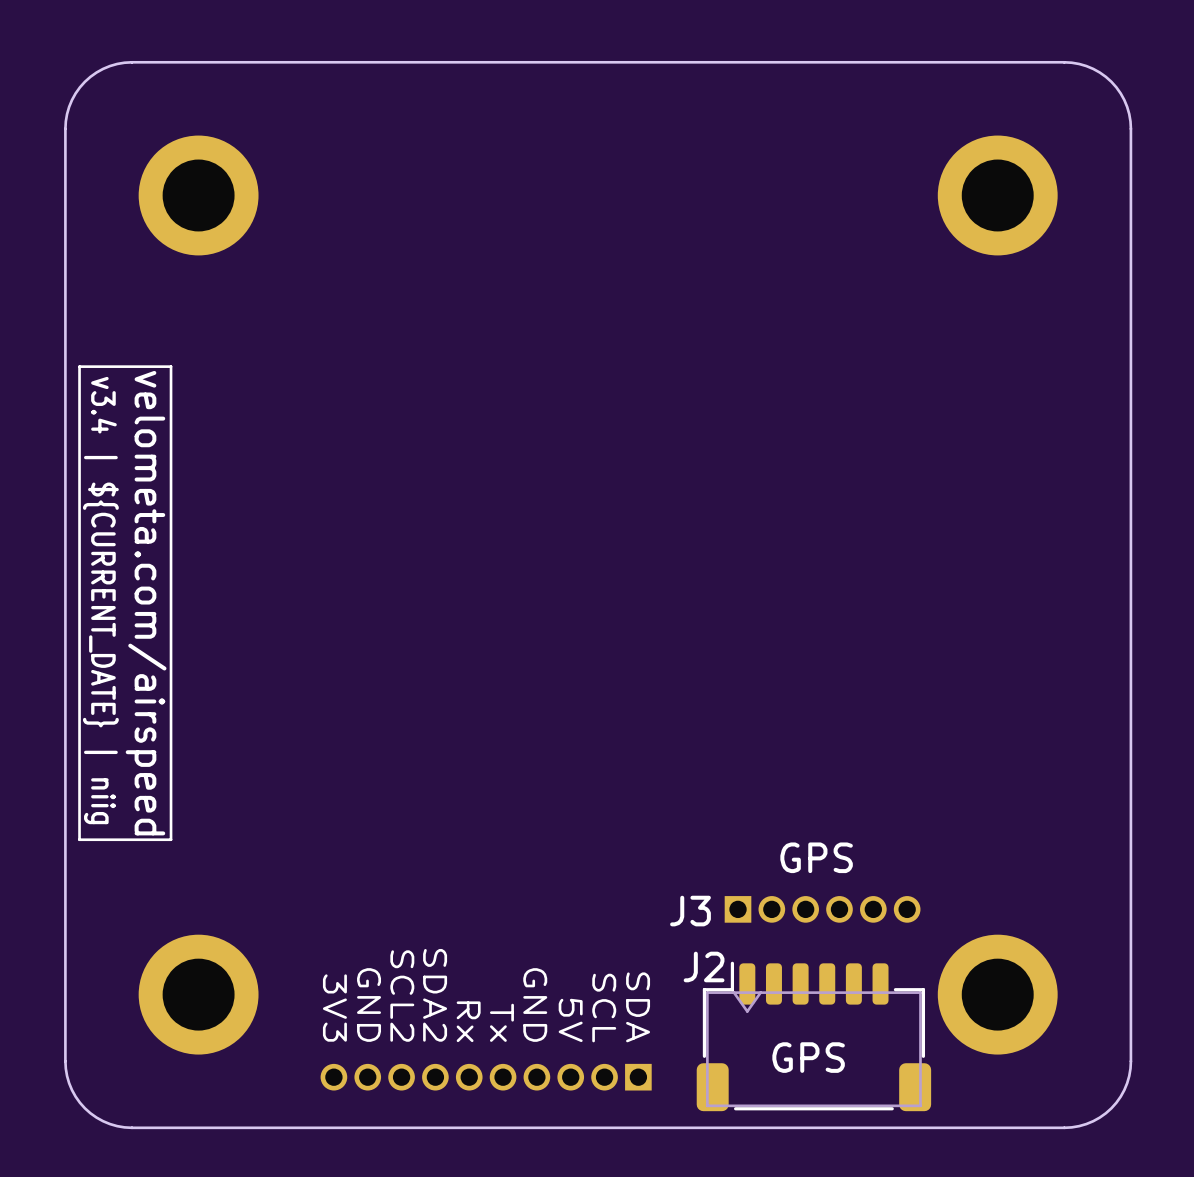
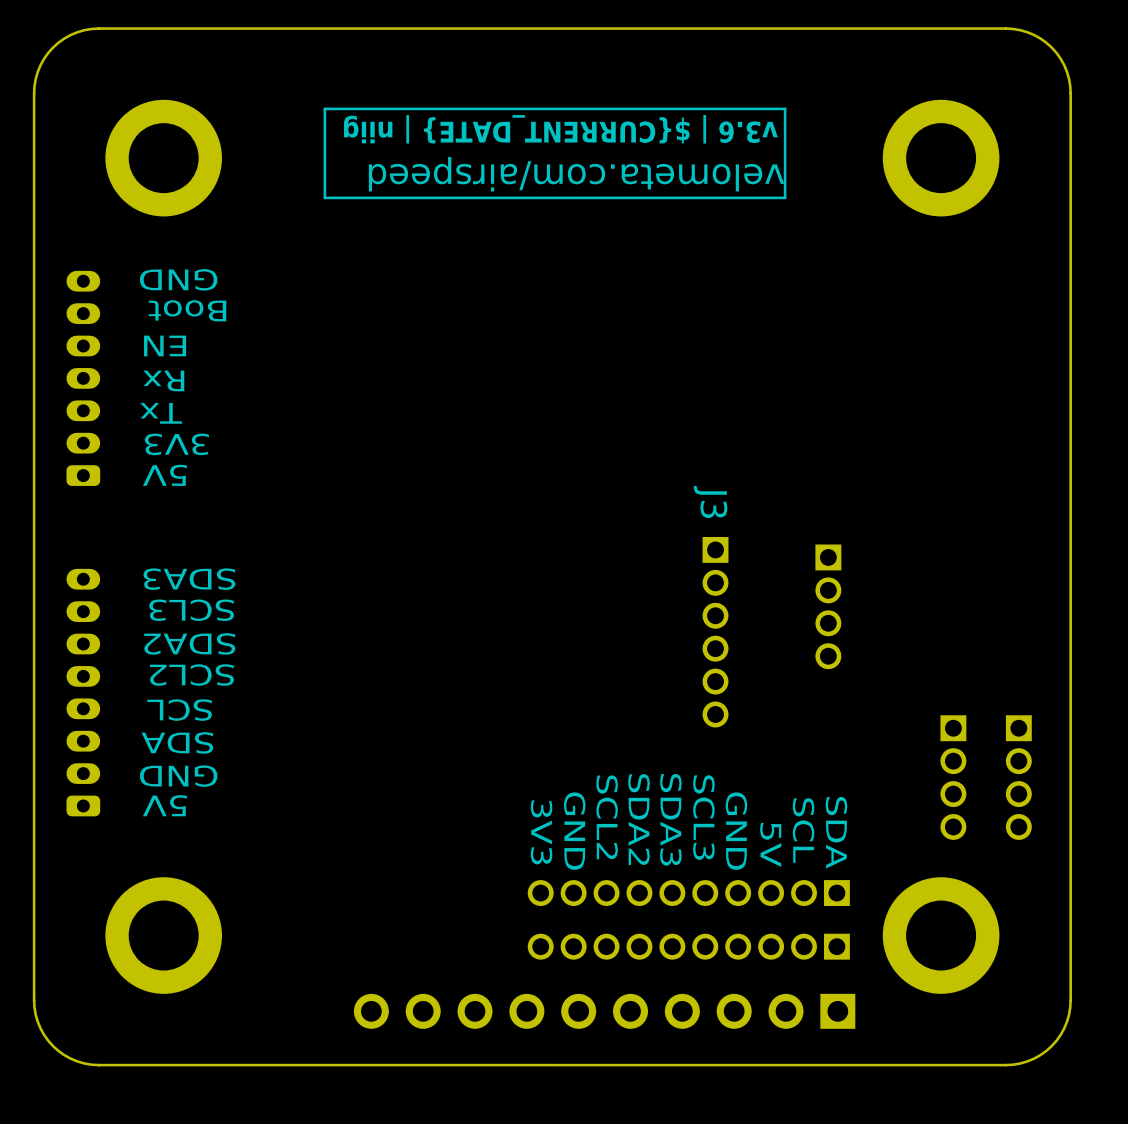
line: none -> (785, 108) (324, 108) (324, 197) (785, 197) (785, 108)
text: none -> v3.6 | ${CURRENT_DATE} | niig (560, 129)
text: none -> velometa.com/airspeed (576, 174)
text: none -> GND (178, 279)
text: none -> Boot (187, 310)
line: (171, 366) (79, 366) (79, 839) (171, 839) (171, 366) -> none
text: none -> EN (165, 345)
part: none -> (83, 378)
text: none -> 3V3 (176, 444)
text: none -> 5V (164, 475)
text: v3.4 | ${CURRENT_DATE} | niig (100, 600) -> none
text: velometa.com/airspeed (146, 603) -> none
text: none -> SDA3 (189, 579)
part: none -> (828, 606)
text: none -> SCL3 (191, 610)
text: none -> SDA2 (189, 643)
text: none -> SCL2 (191, 675)
part: none -> (83, 692)
text: none -> SCL (179, 710)
text: none -> SDA (177, 742)
text: none -> GND (178, 776)
part: none -> (953, 777)
part: none -> (1018, 777)
J3 value: GPS (816, 857) -> none
text: none -> 5V (164, 805)
text: none -> SDA3 (670, 819)
text: none -> SCL2 (607, 817)
text: none -> SDA2 (639, 819)
text: none -> SCL3 (703, 817)
text: none -> GND (574, 831)
text: none -> GND (736, 831)
text: none -> 3V3 (541, 832)
text: none -> SCL (803, 830)
text: none -> SDA (836, 832)
text: none -> 5V (770, 844)
J3 rotation: 0° (822, 909) -> 90° clockwise (715, 632)
J3 position: (822, 909) -> (715, 632)
part: none -> (688, 893)
text: SDA2 (435, 995) -> none
text: SCL2 (402, 996) -> none
text: GND (369, 1005) -> none
text: GND (535, 1005) -> none
part: none -> (688, 946)
text: SDA (638, 1007) -> none
text: 3V3 (334, 1008) -> none
text: SCL (604, 1008) -> none
text: 5V (570, 1020) -> none
text rotation: 0° (468, 1021) -> 90° clockwise (163, 380)
text position: Rx (468, 1021) -> Rx (163, 380)
text rotation: 0° (501, 1022) -> 90° clockwise (161, 413)
text position: Tx (501, 1022) -> Tx (161, 413)
J2: GPS (813, 1036) -> none
part: none -> (604, 1011)
part: (486, 1077) -> none

